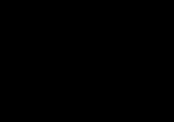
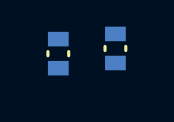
part: none -> (115, 48)
part: none -> (58, 53)

